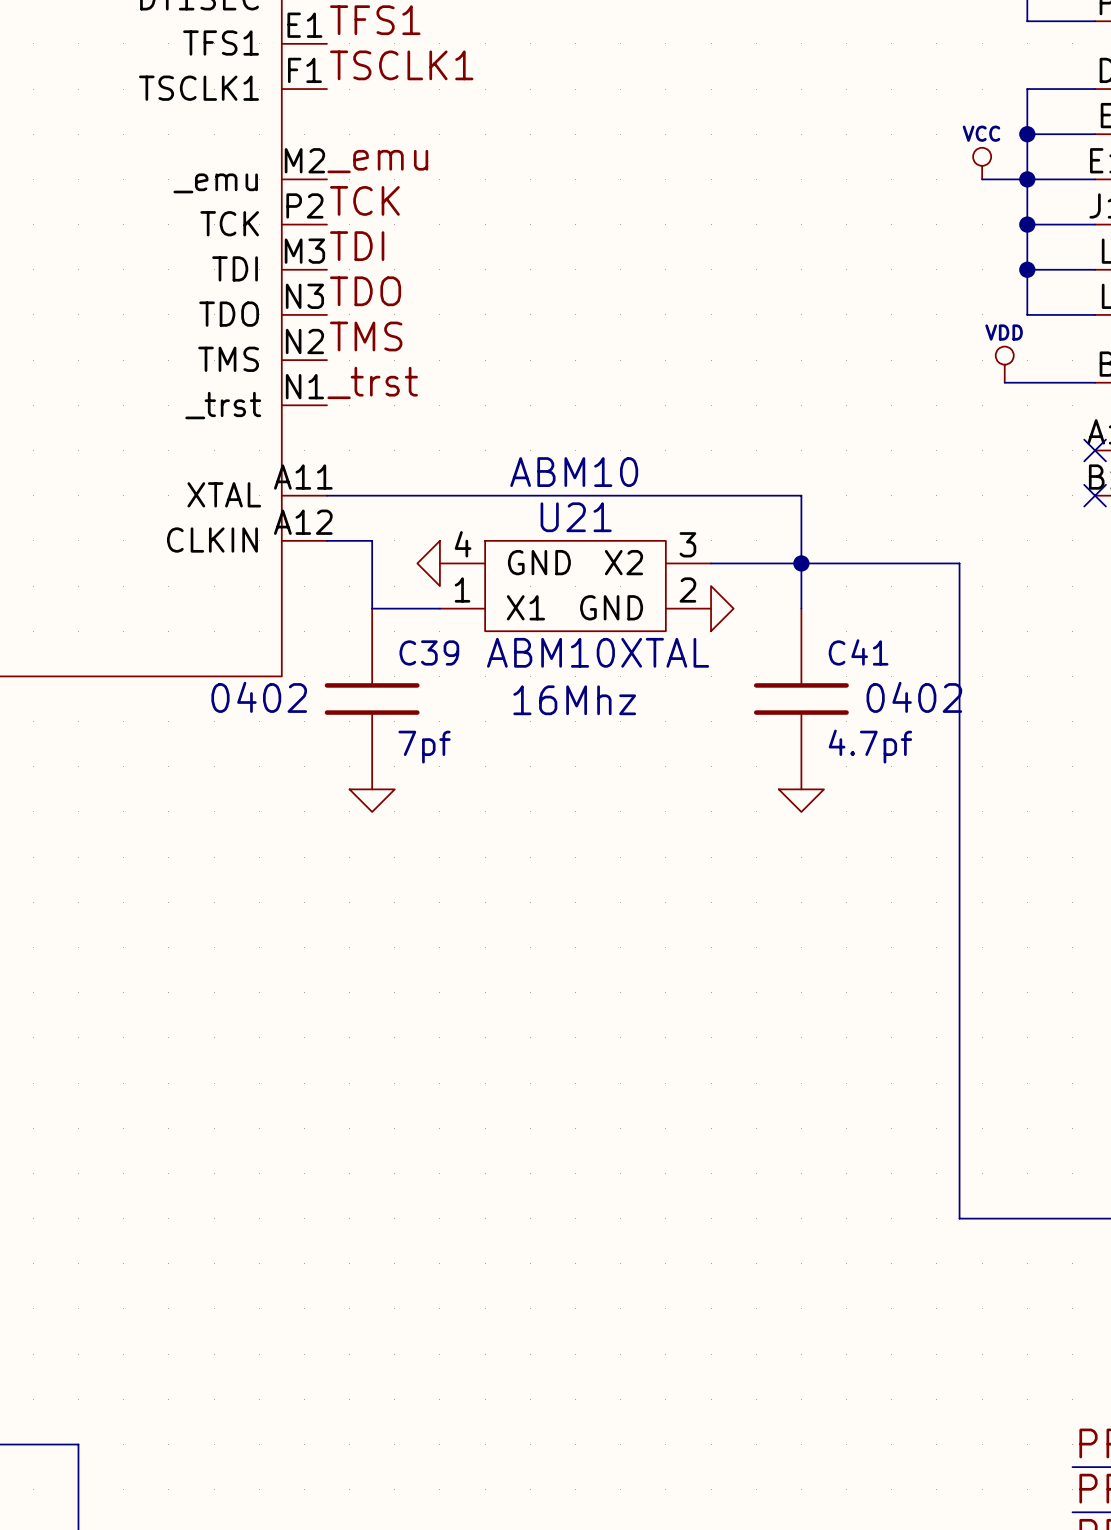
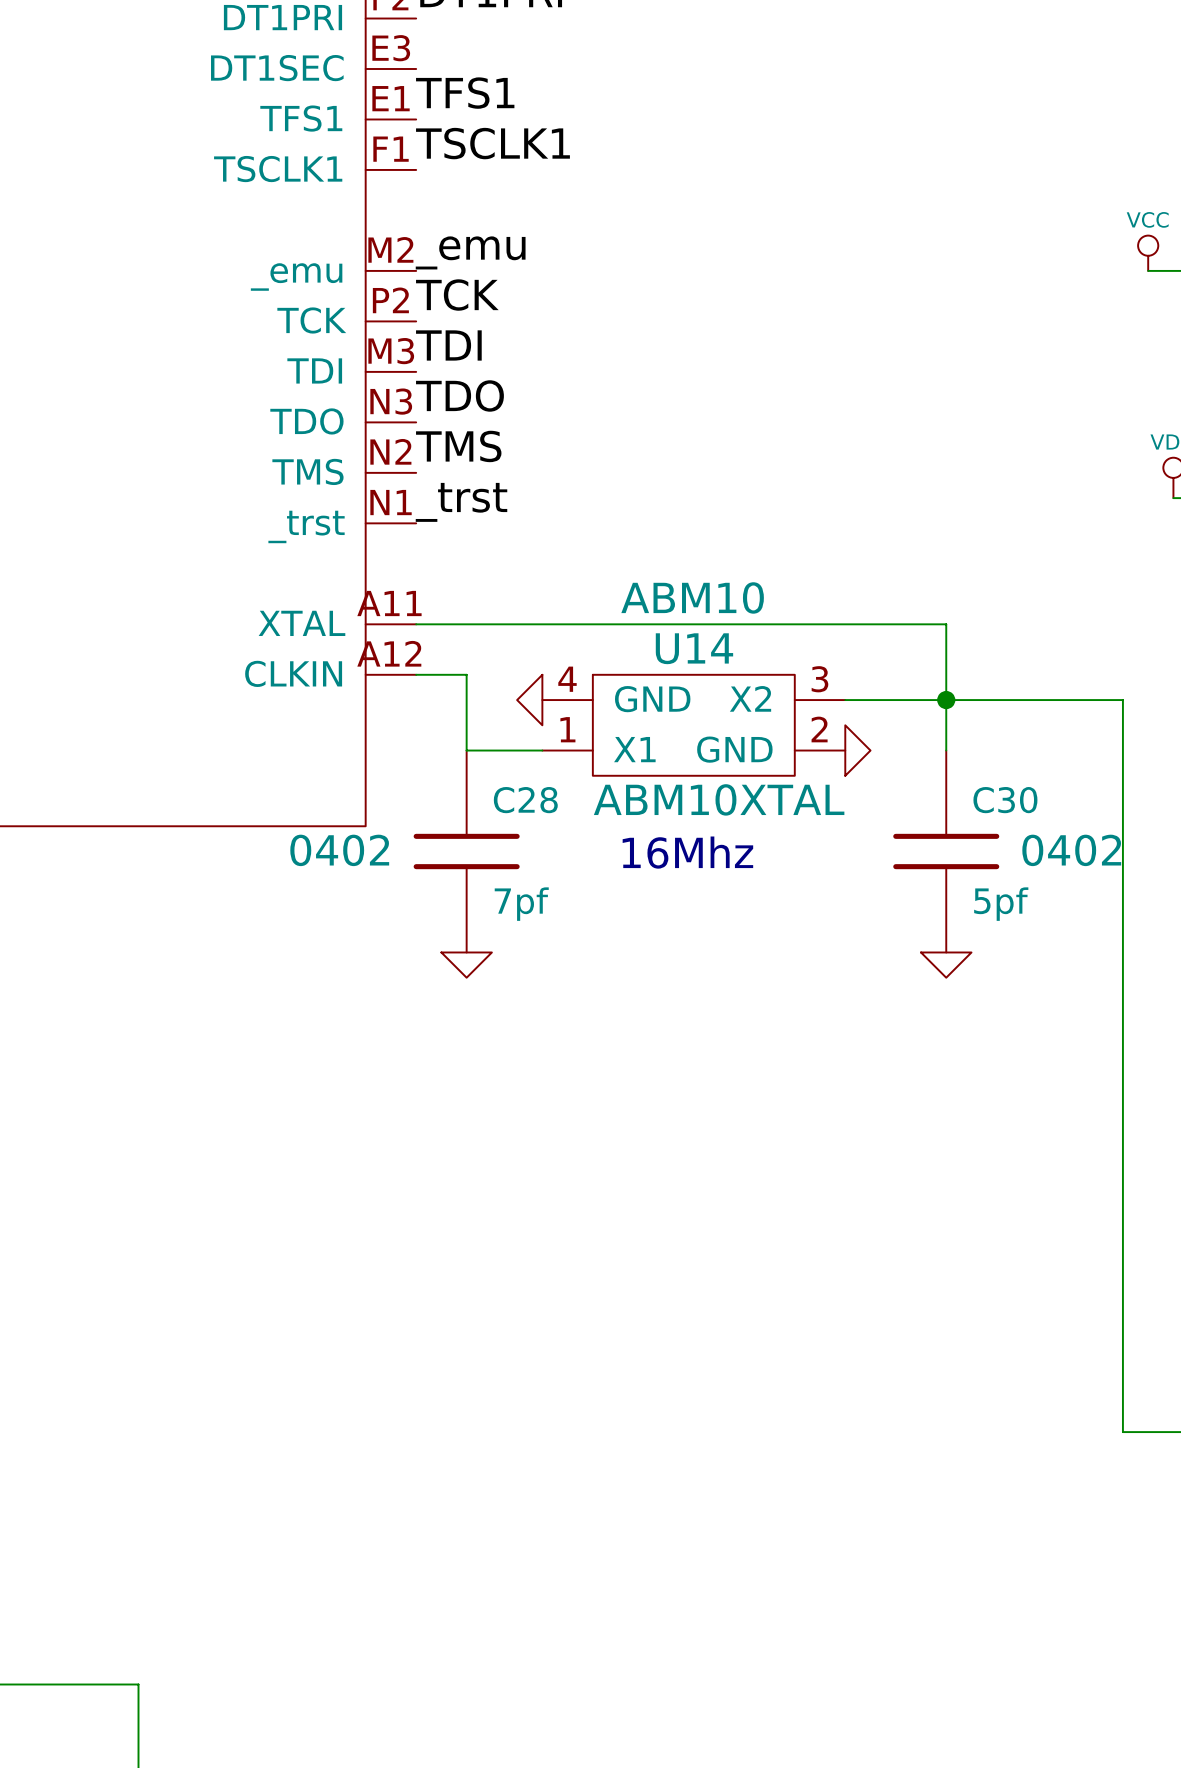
U21 name: U21 (576, 517) -> U14 (694, 648)
C39 name: C39 (429, 652) -> C28 (525, 800)
C41 name: C41 (858, 652) -> C30 (1005, 800)
C41 value: 4.7pf (870, 746) -> 5pf (1001, 904)

